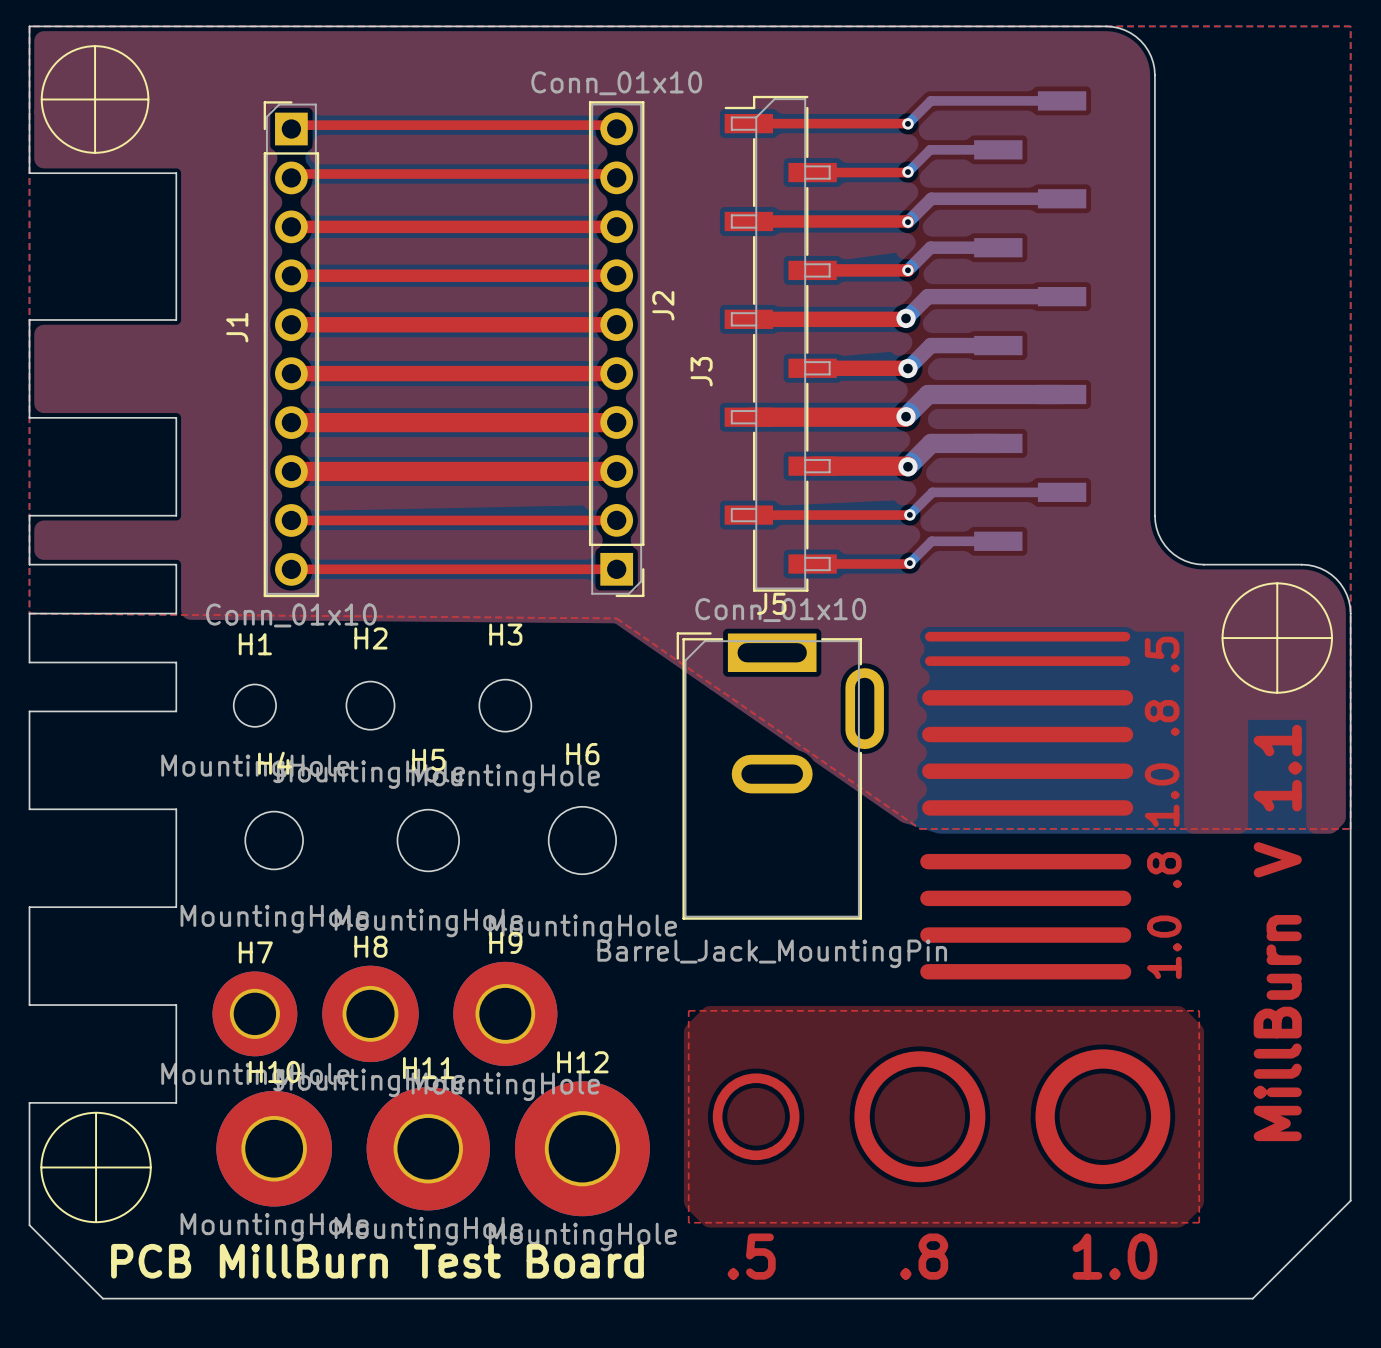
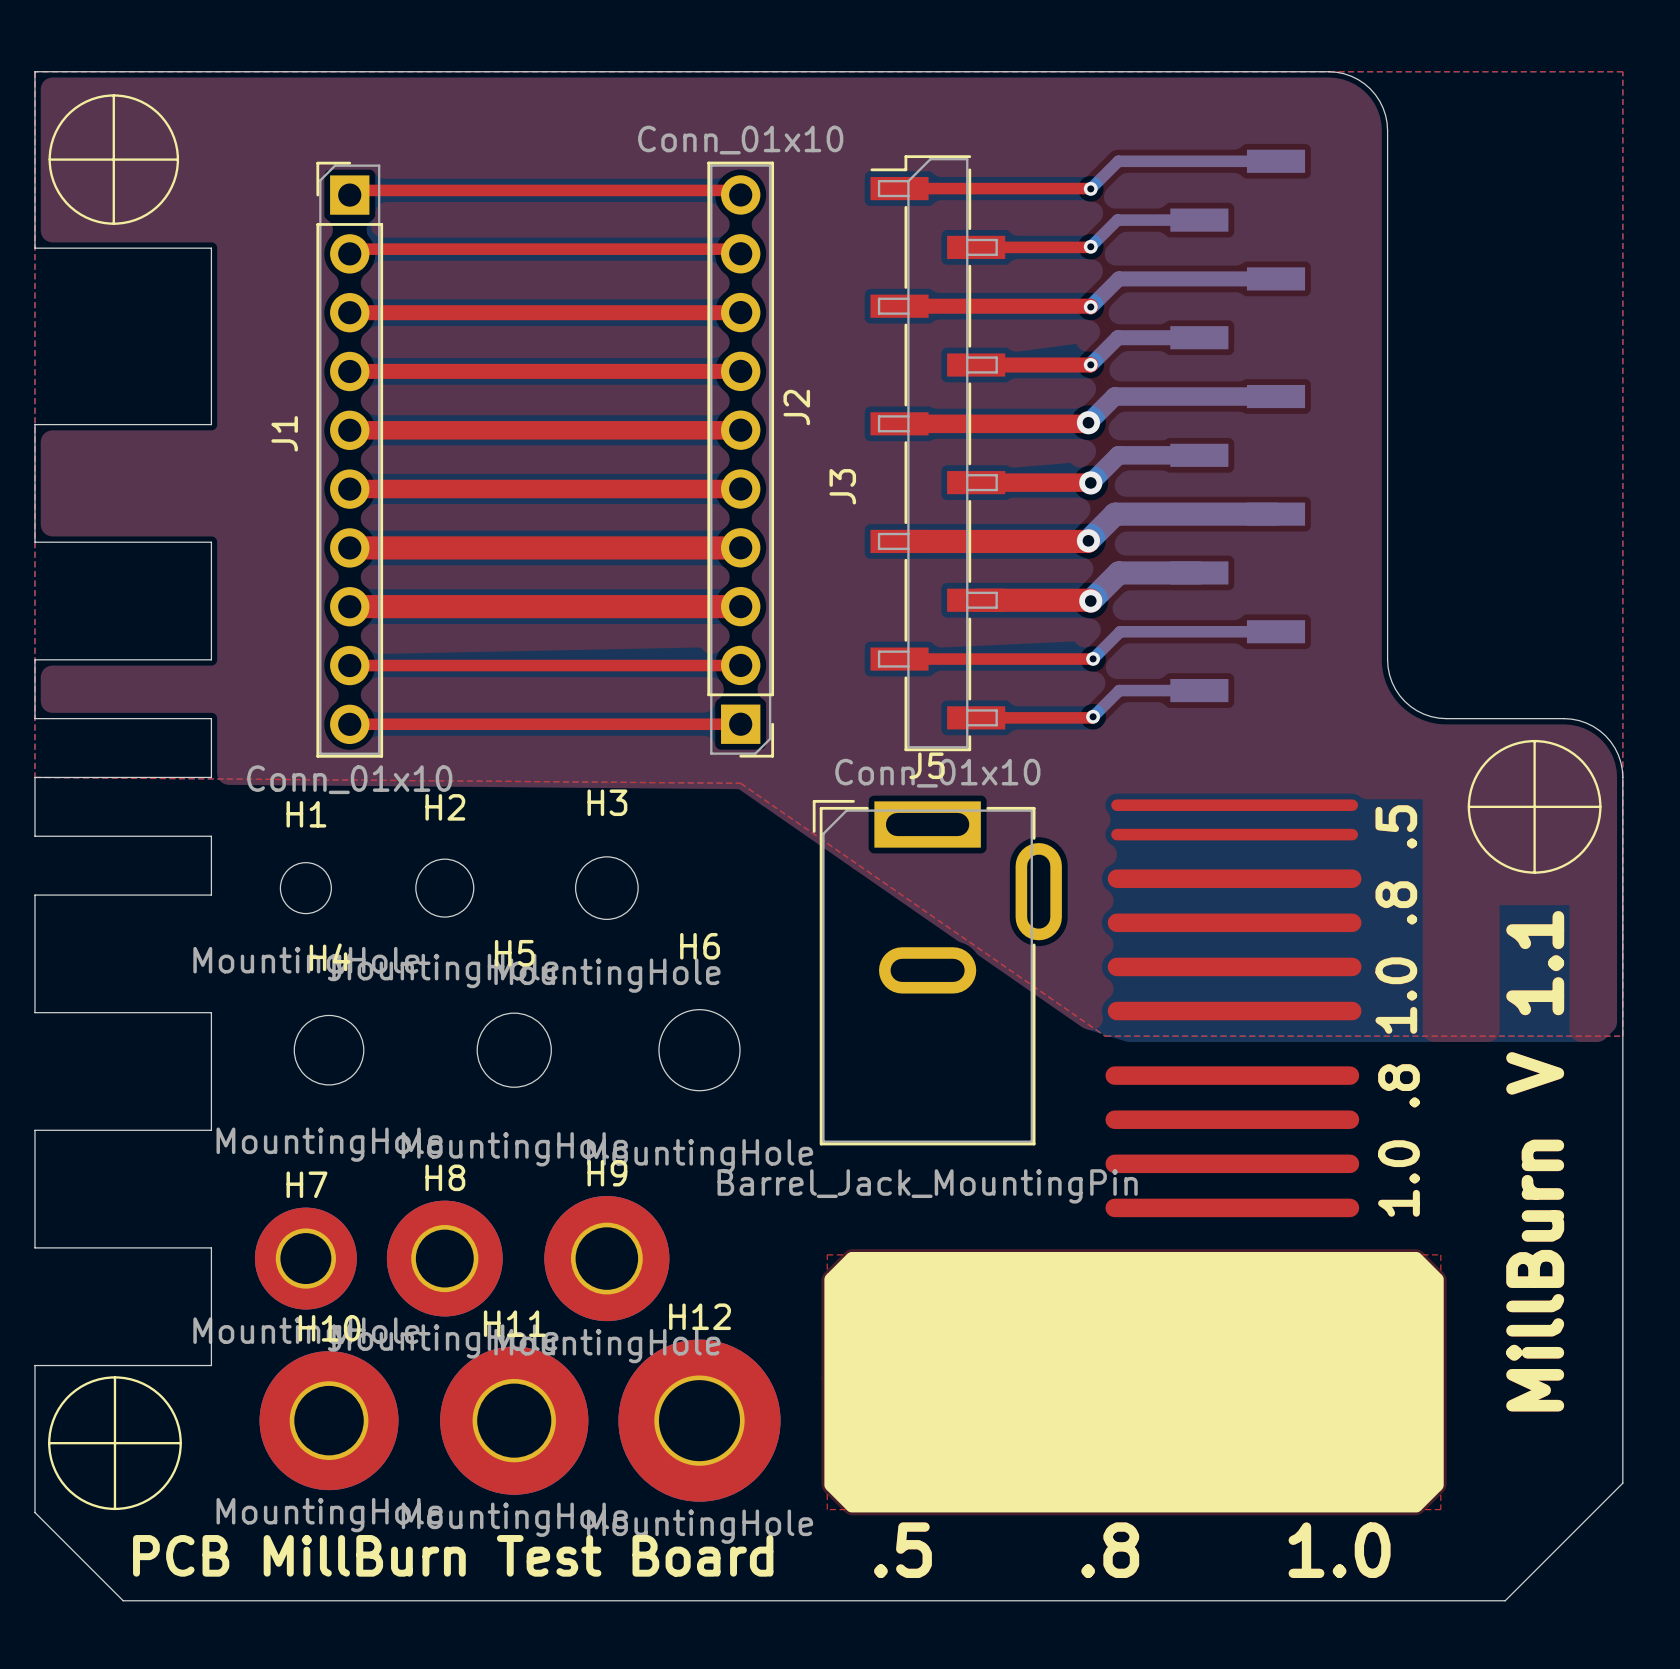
text: none -> 1.0 .8 .5 (1396, 919)
text: none -> V 1.1 (1535, 1002)
text: none -> 1.0 .8 (1399, 1140)
drawing: none -> [824, 1251, 1444, 1513]
text: none -> MillBurn (1535, 1275)
text: none -> .5 .8 1.0 (1132, 1550)

